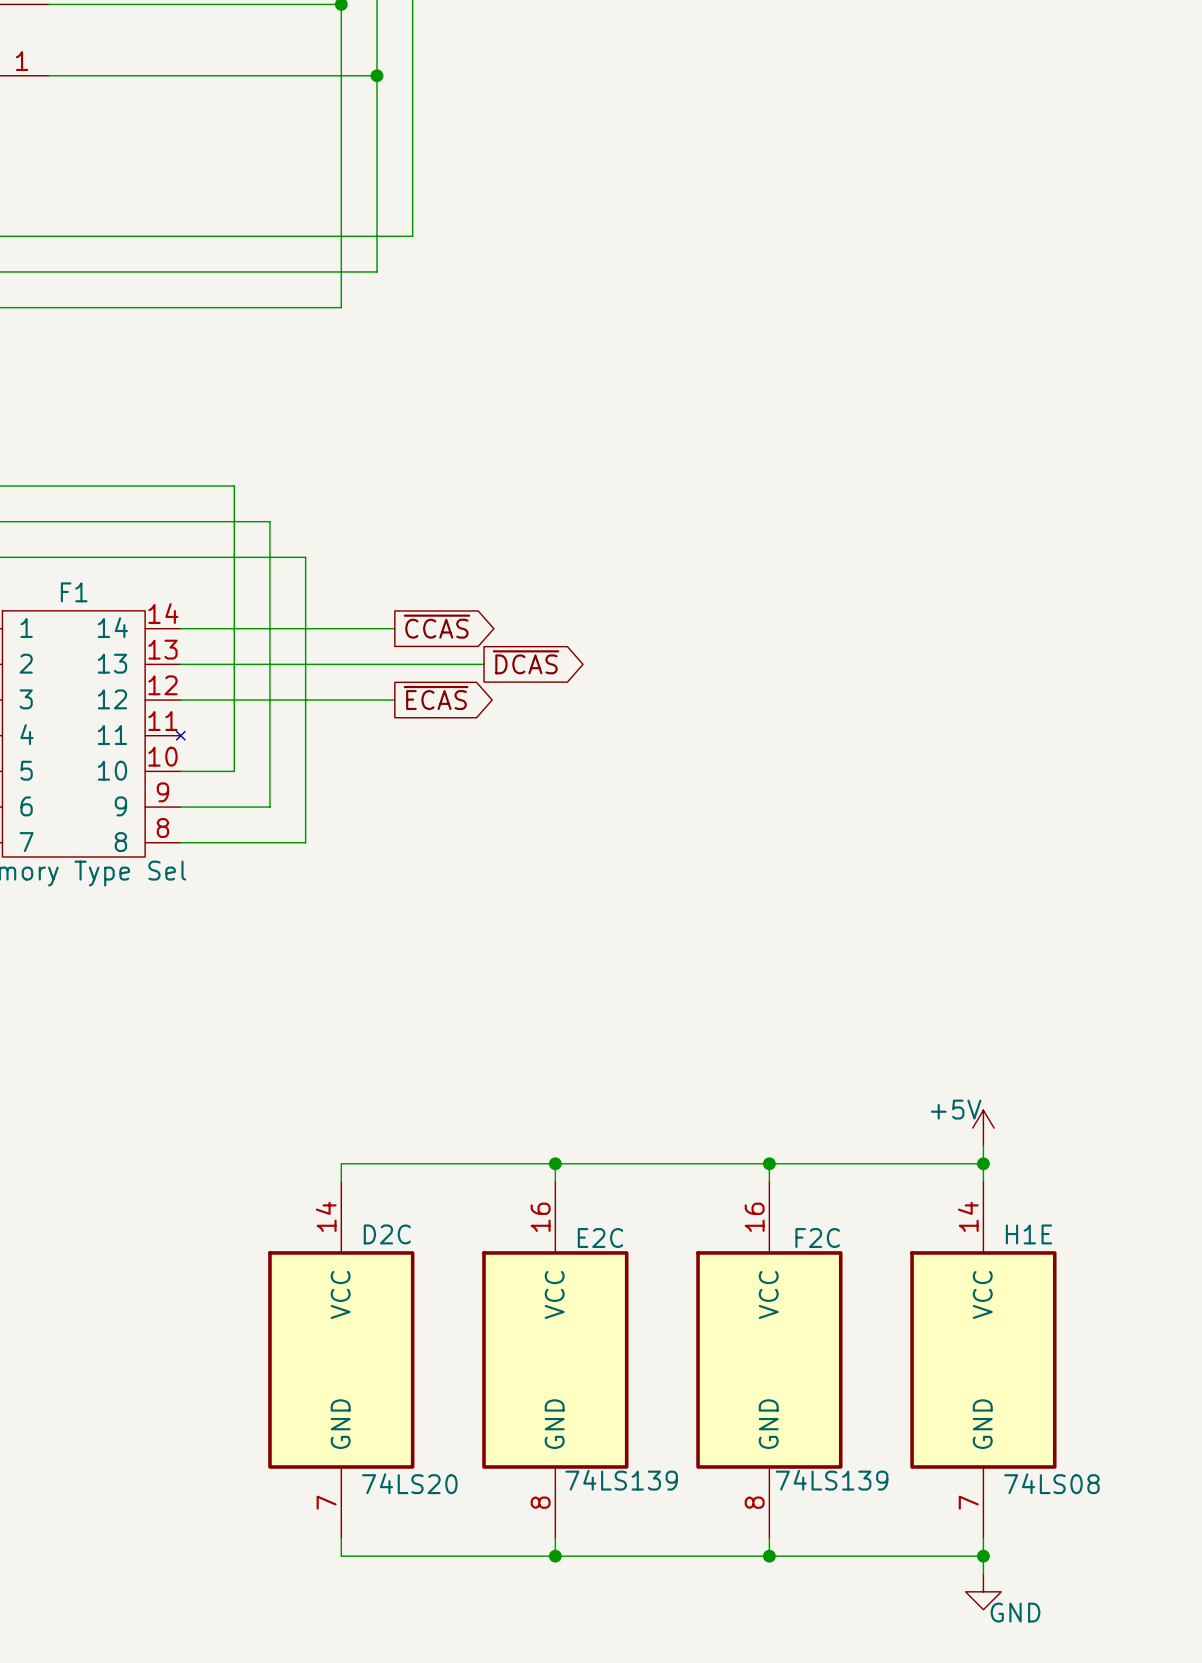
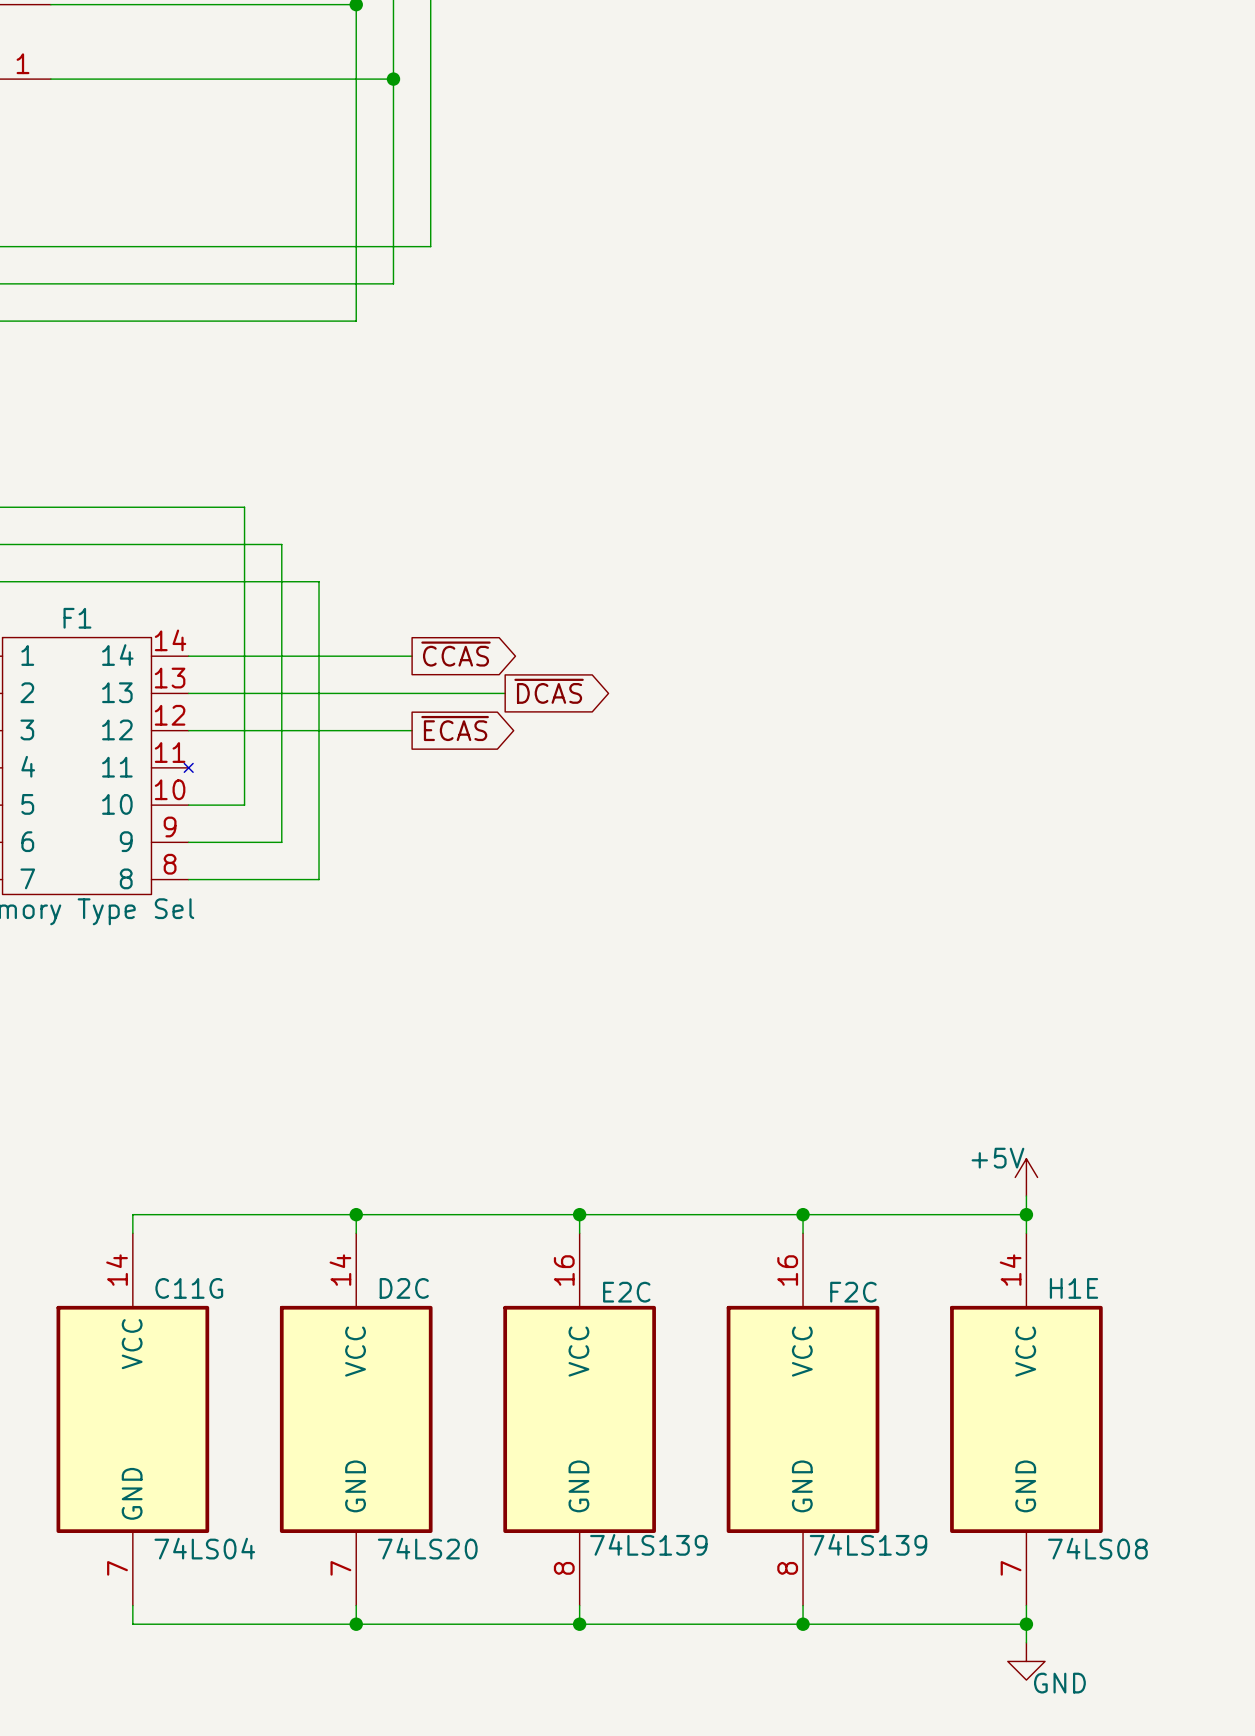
wire: none -> (356, 1214) (132, 1214) (132, 1233)
junction: none -> (356, 1214)
C11G: none -> 74LS04 (132, 1419)
wire: none -> (132, 1605) (132, 1624) (356, 1624)
junction: none -> (356, 1624)

